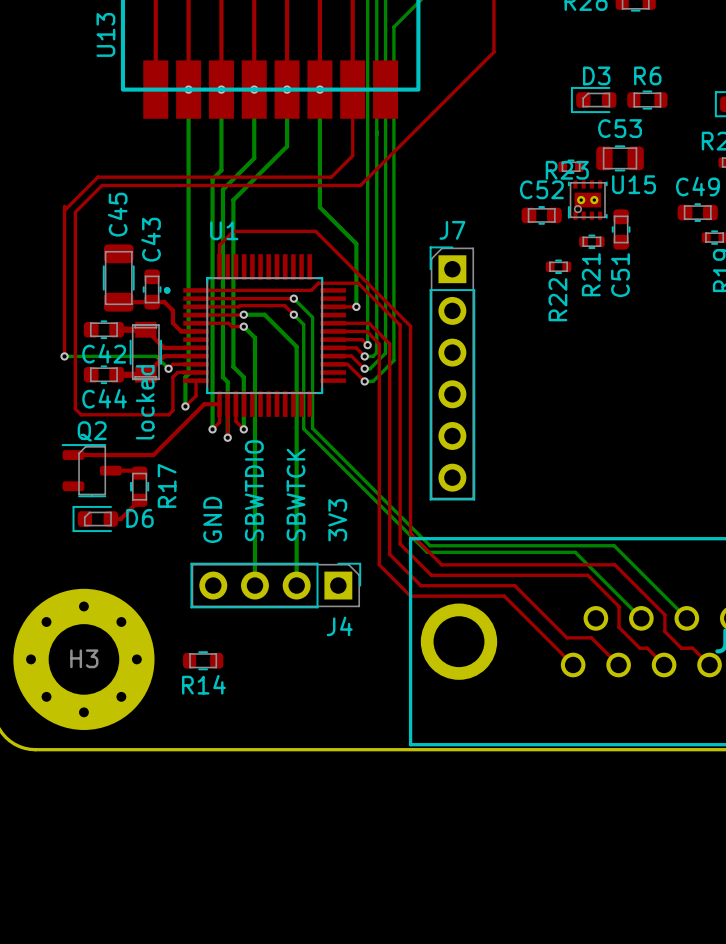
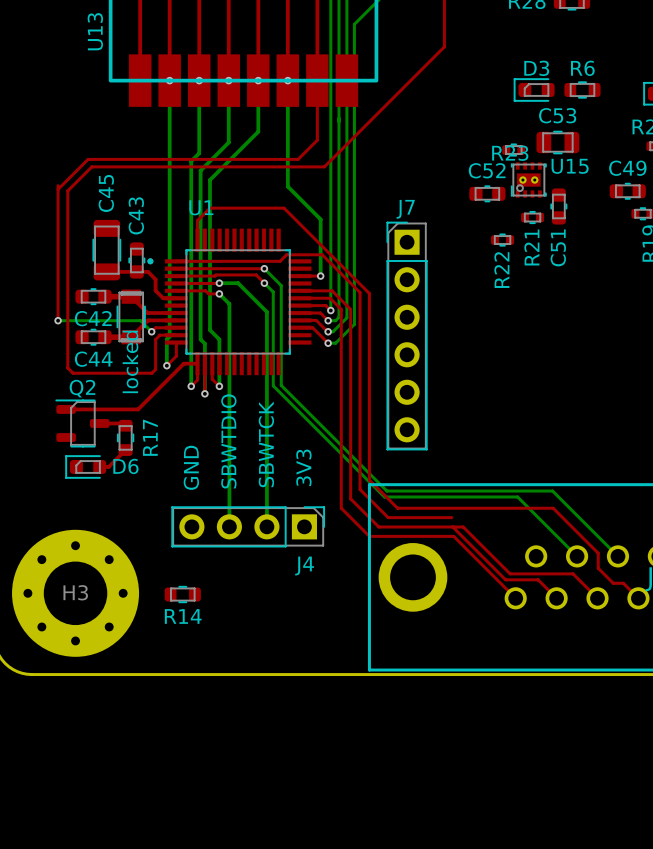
top track: (502, 575) (587, 575) (619, 606) (619, 627) (639, 648) (647, 648) -> none
top track: none -> (452, 527) (505, 579) (538, 579)
top track: (591, 637) (598, 644) -> (532, 573) (573, 573) (582, 583)

